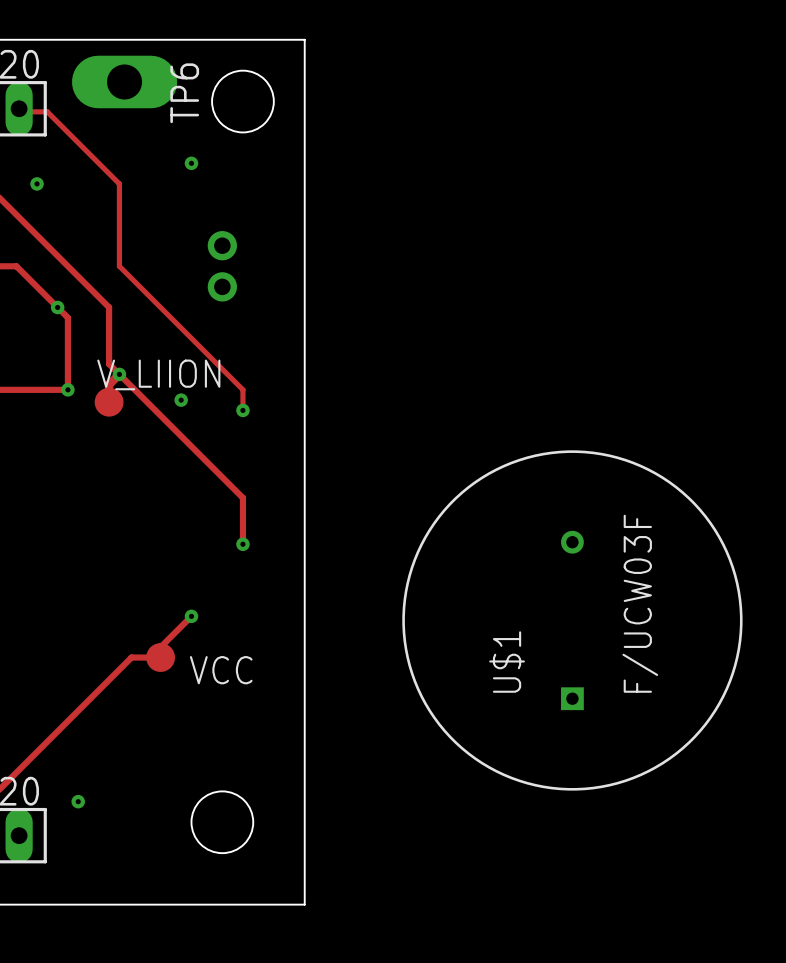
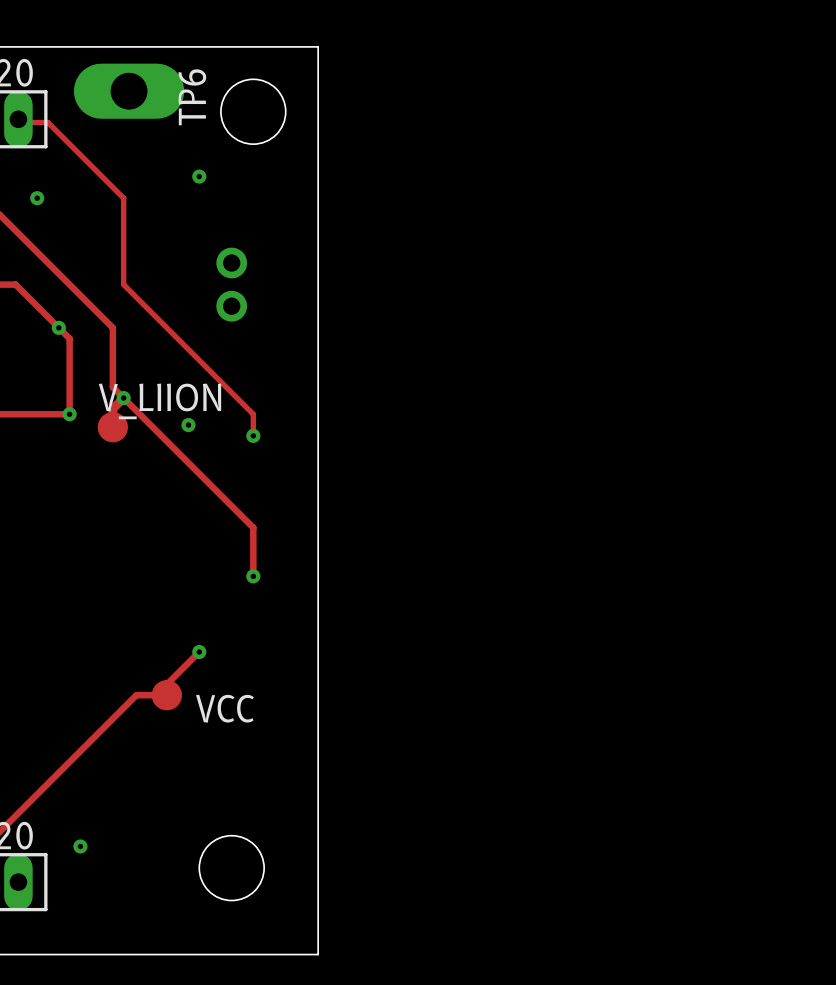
U$1: F/UCW03F (572, 620) -> none

